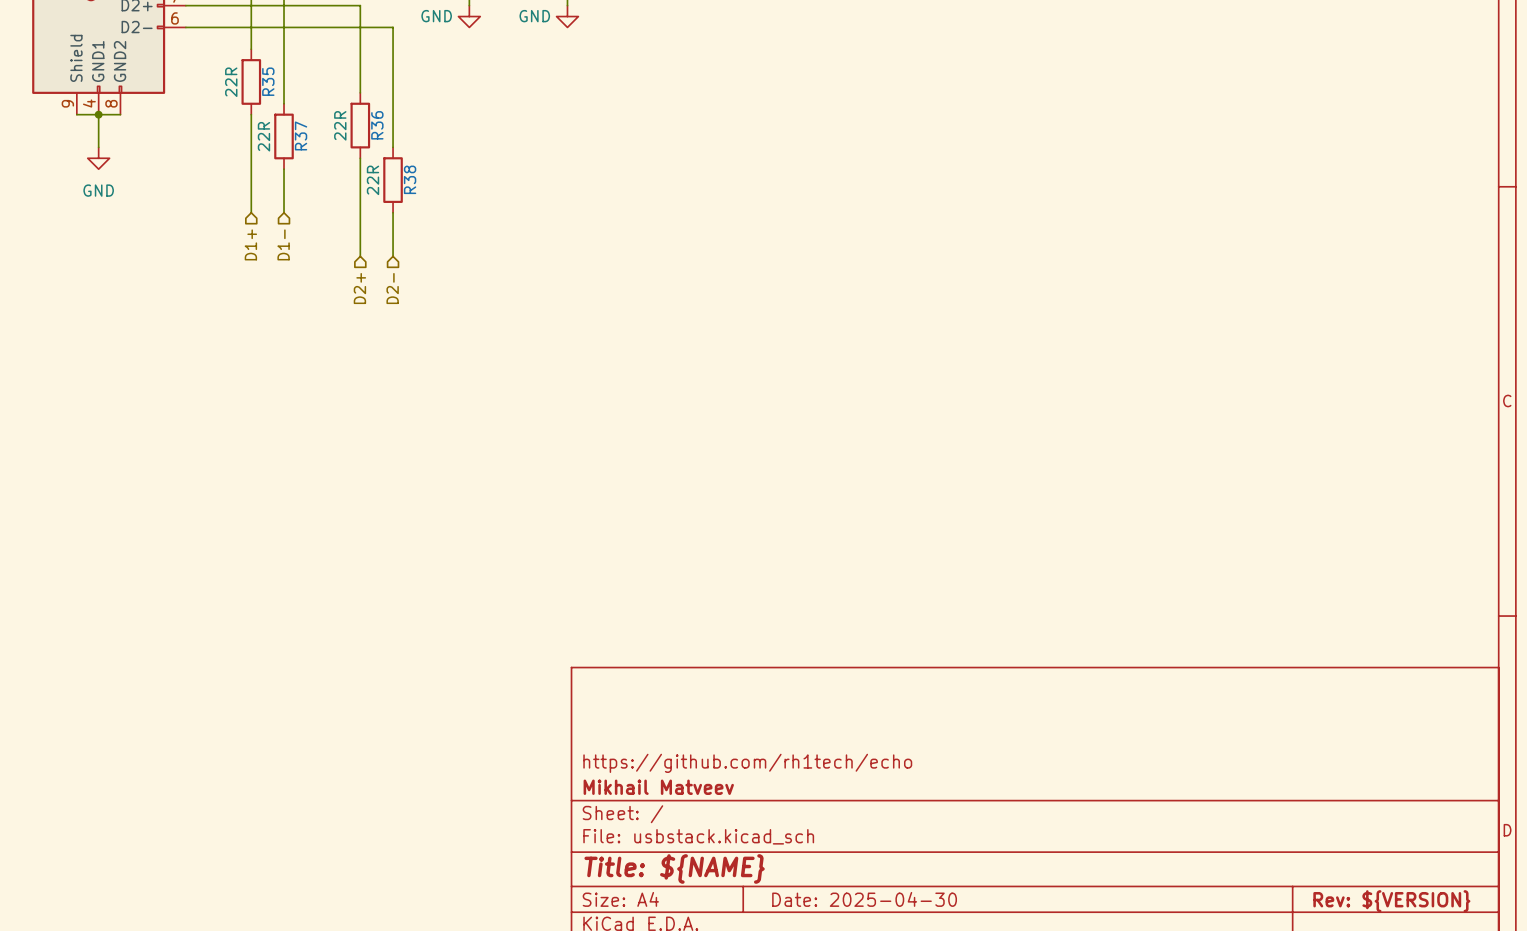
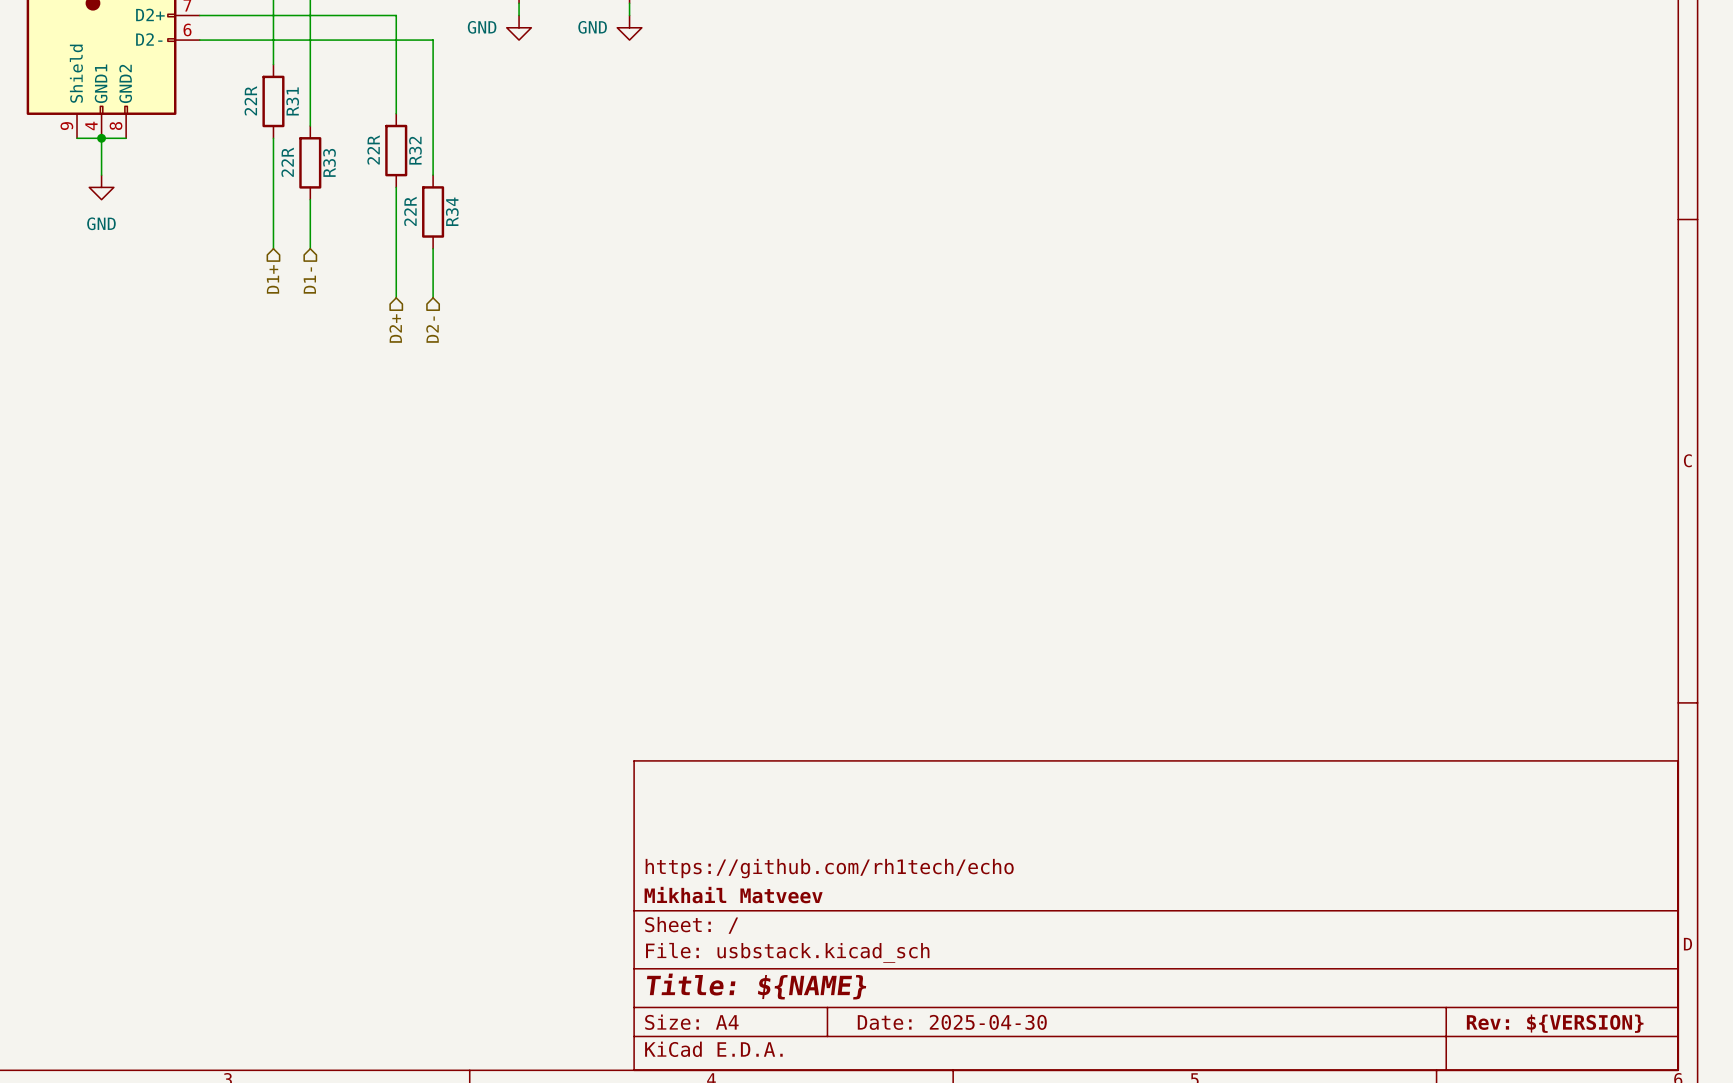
R35 name: R35 (268, 81) -> R31 (292, 101)
R36 name: R36 (377, 125) -> R32 (415, 150)
R37 name: R37 (301, 135) -> R33 (329, 162)
R38 name: R38 (410, 179) -> R34 (452, 211)

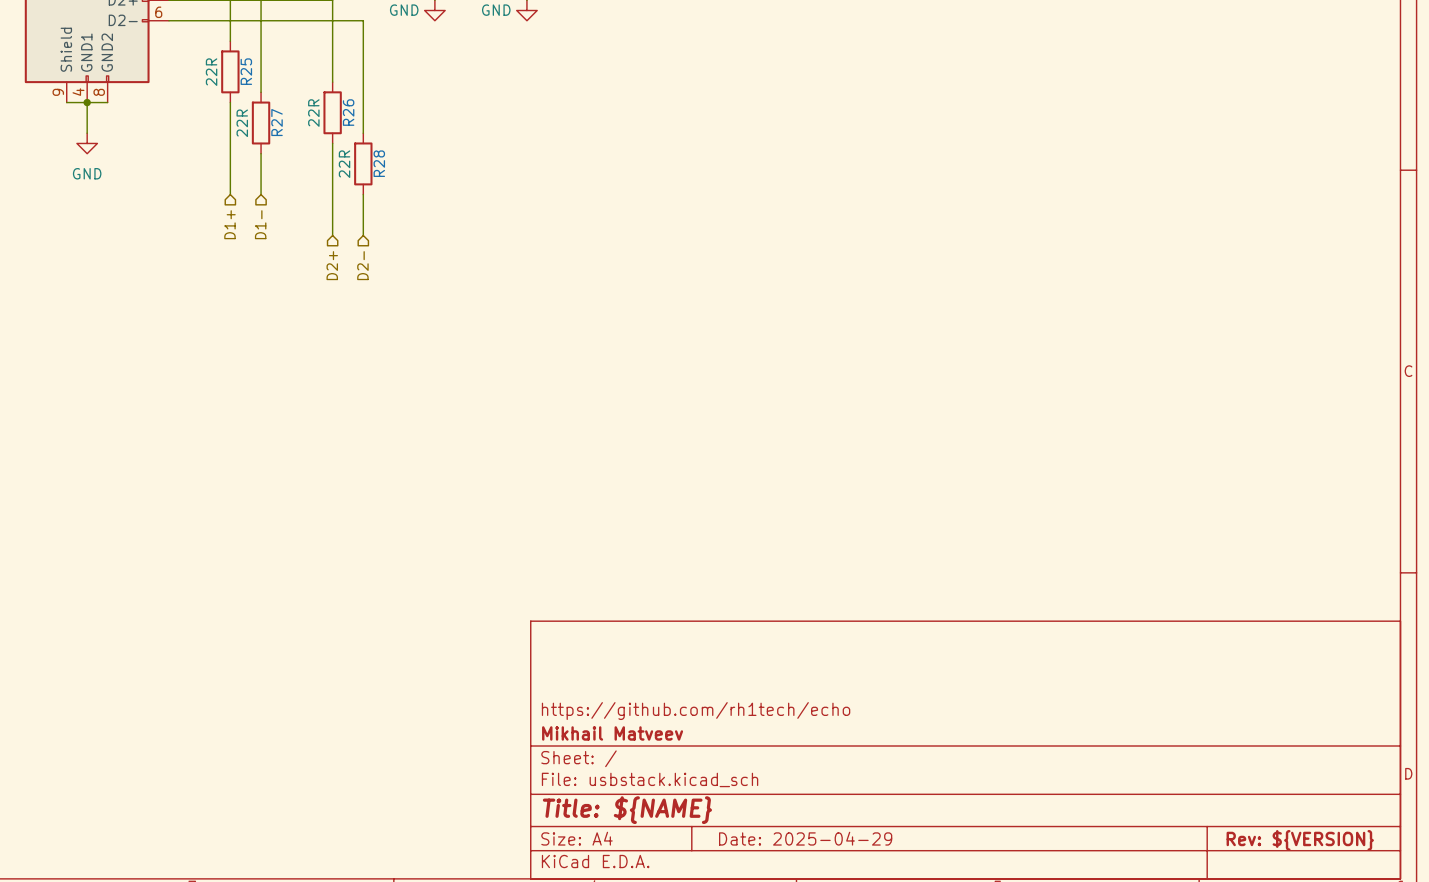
R31 name: R31 (292, 101) -> R25 (246, 71)
R32 name: R32 (415, 150) -> R26 (348, 112)
R33 name: R33 (329, 162) -> R27 (277, 122)
R34 name: R34 (452, 211) -> R28 (379, 163)
title block: Date: 2025-04-30 (952, 1022) -> Date: 2025-04-29 (805, 838)

